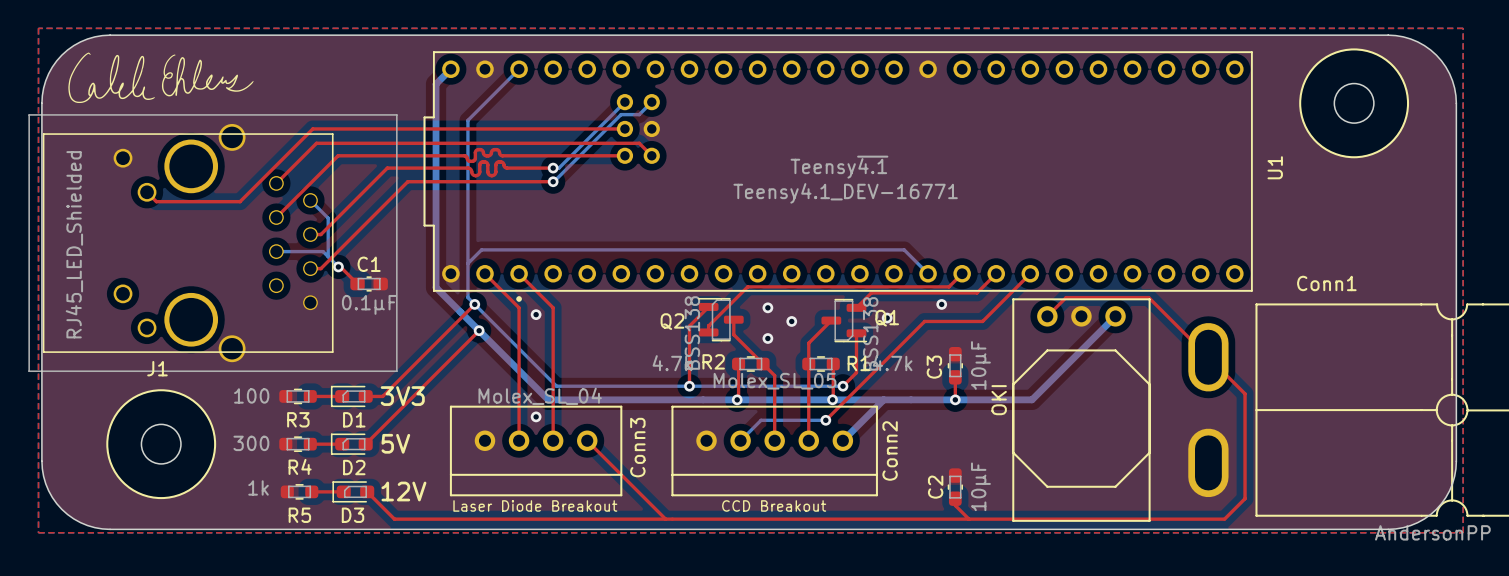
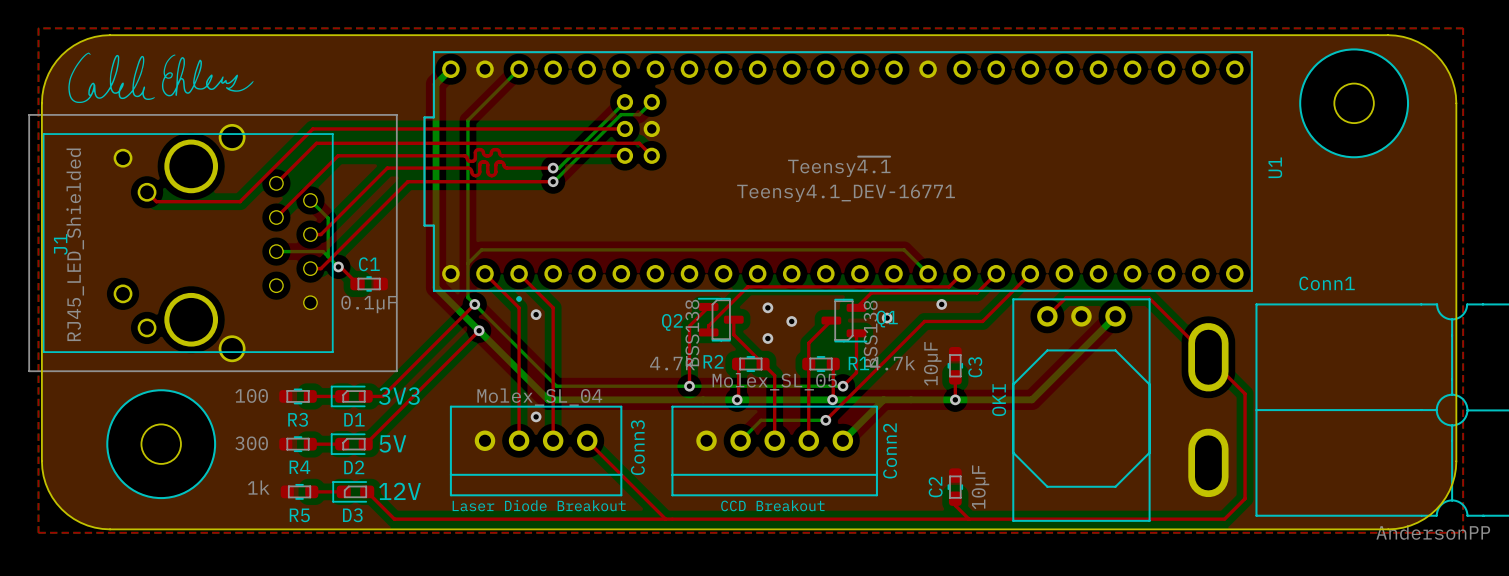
C3 value position: 10µF (980, 365) -> 10µF (932, 363)
C3 name position: C3 (934, 367) -> C3 (975, 367)
J1 name rotation: 0° (157, 368) -> 90° counterclockwise (60, 244)
J1 name position: J1 (157, 368) -> J1 (60, 244)

